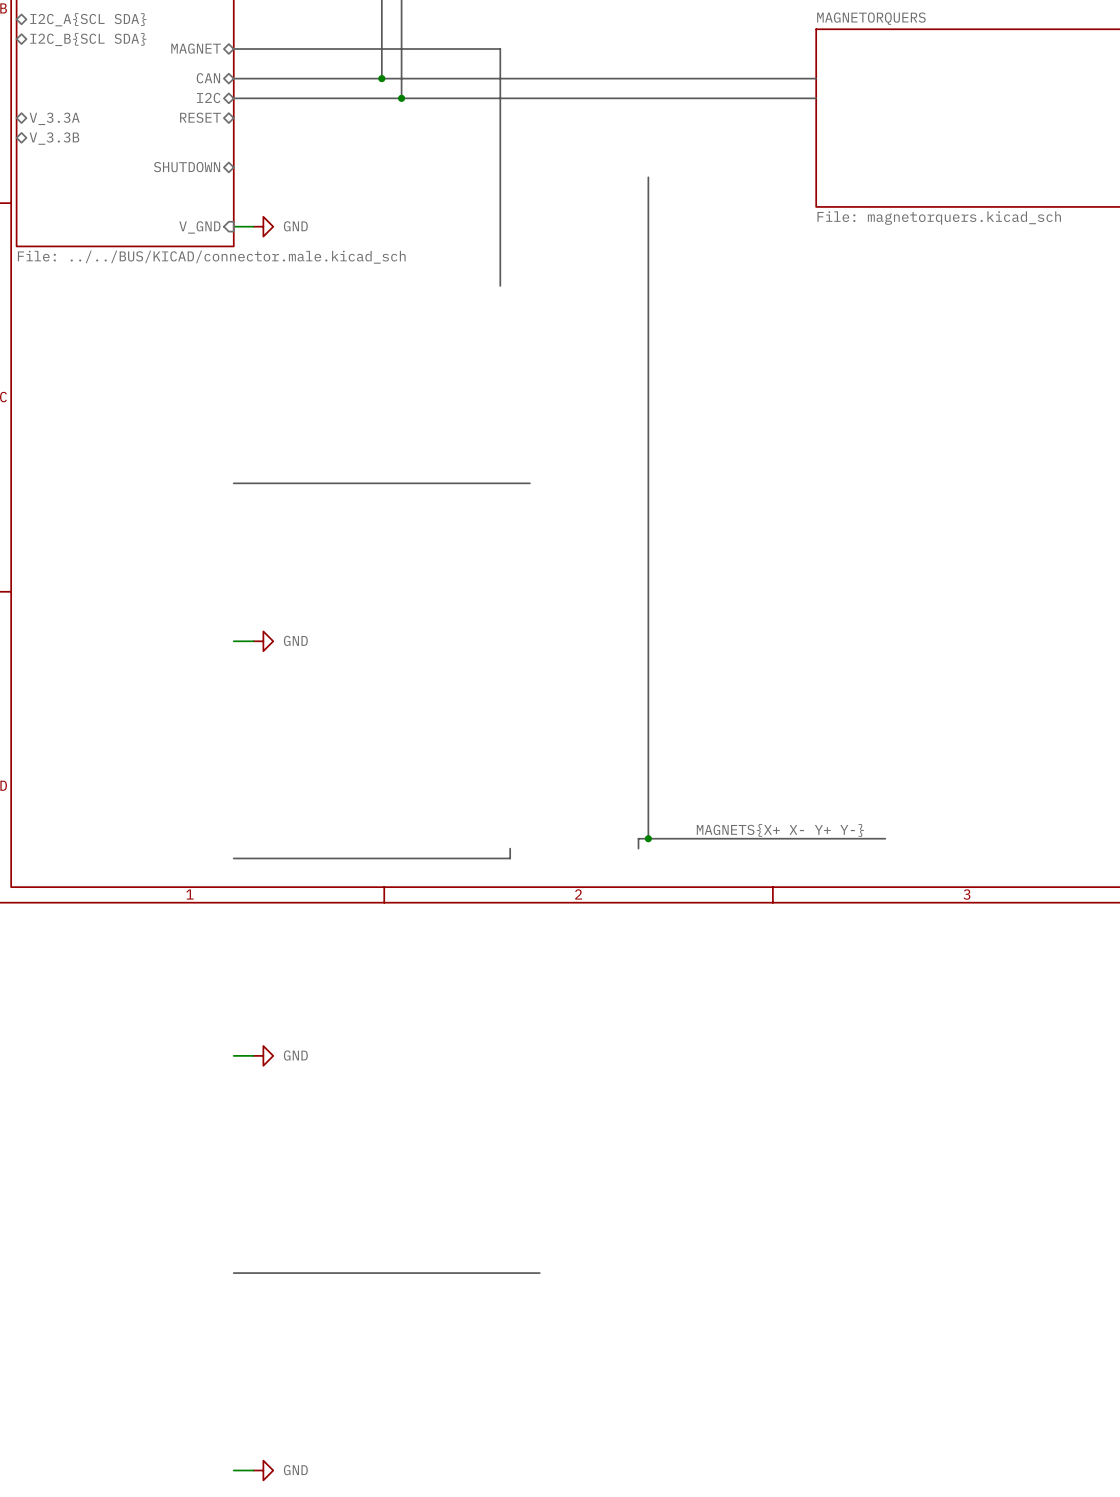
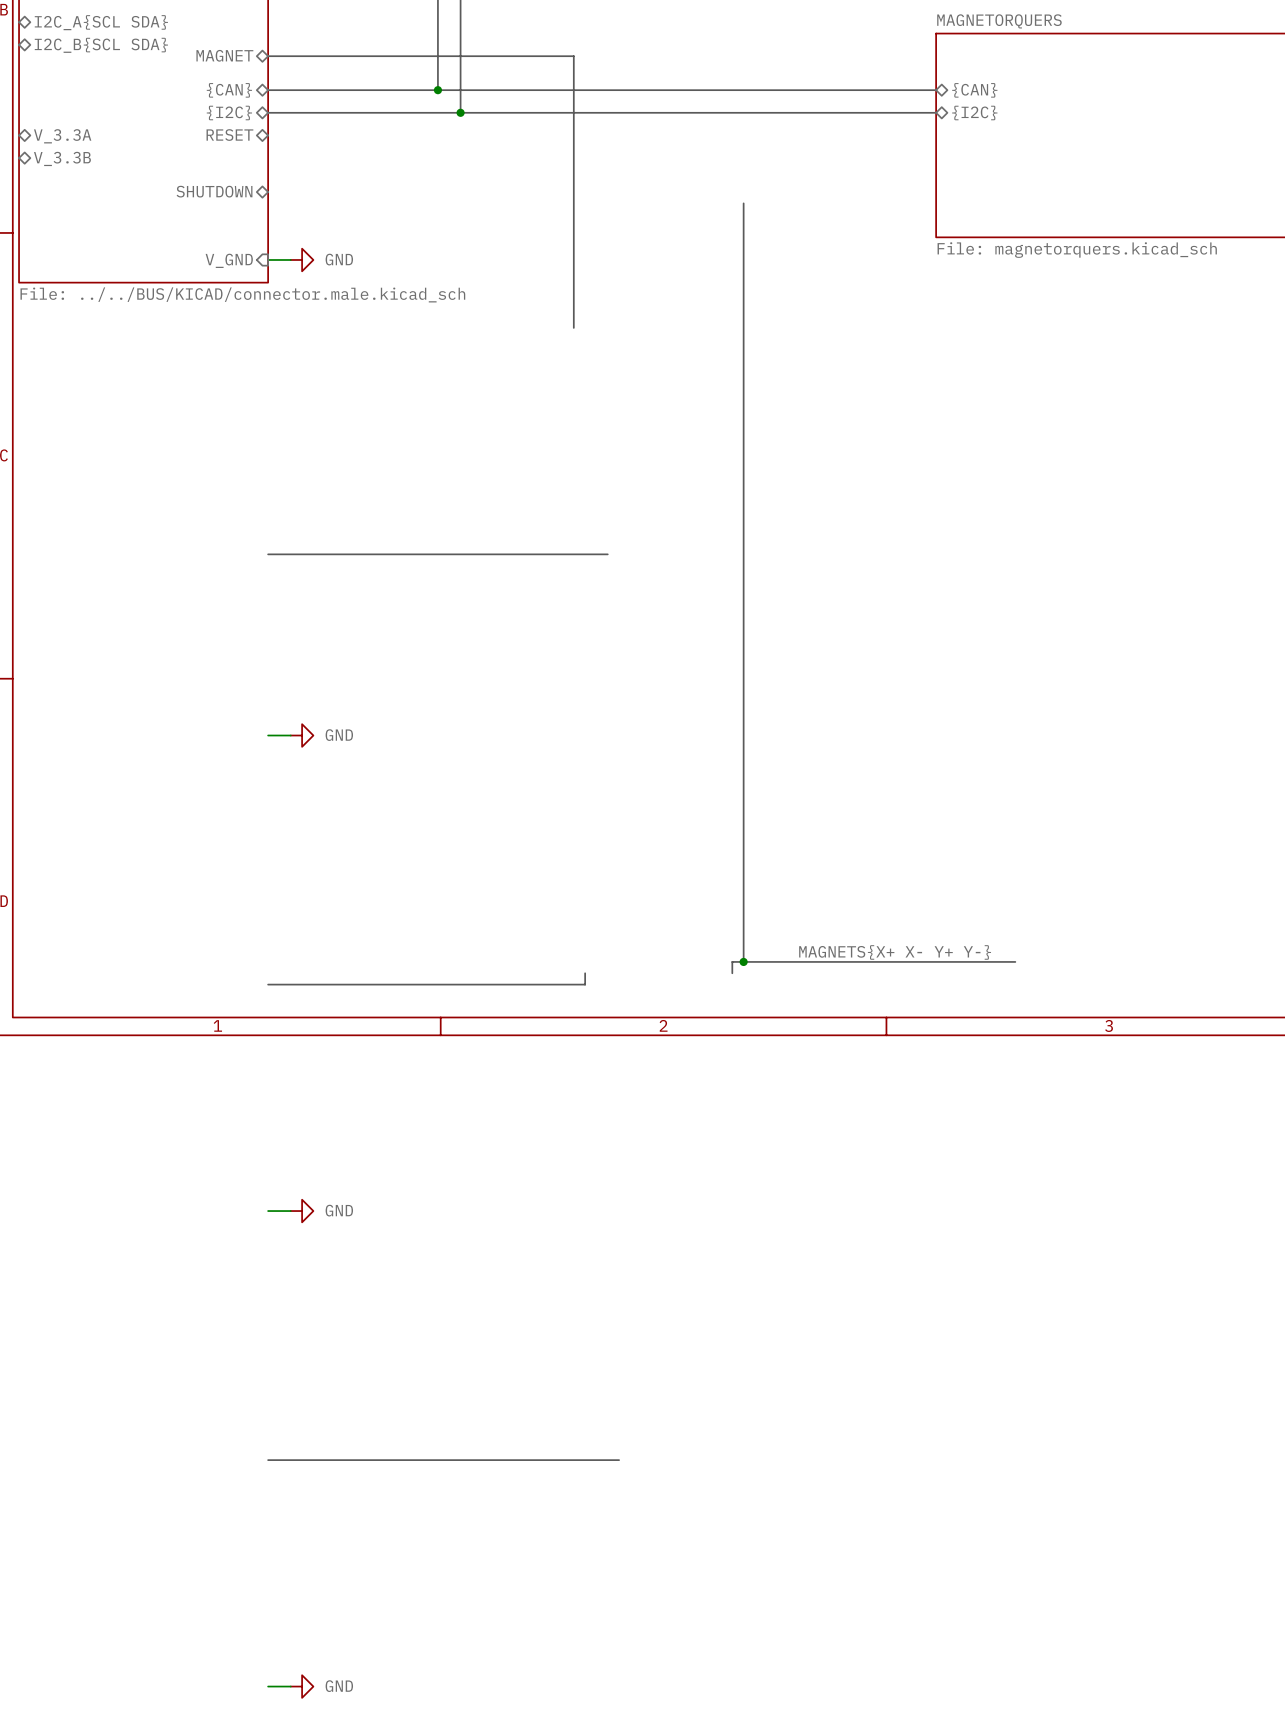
sheet pin: CAN (208, 78) -> {CAN} (229, 90)
sheet pin: none -> {CAN} (974, 90)
sheet pin: I2C (208, 97) -> {I2C} (229, 113)
sheet pin: none -> {I2C} (974, 113)

